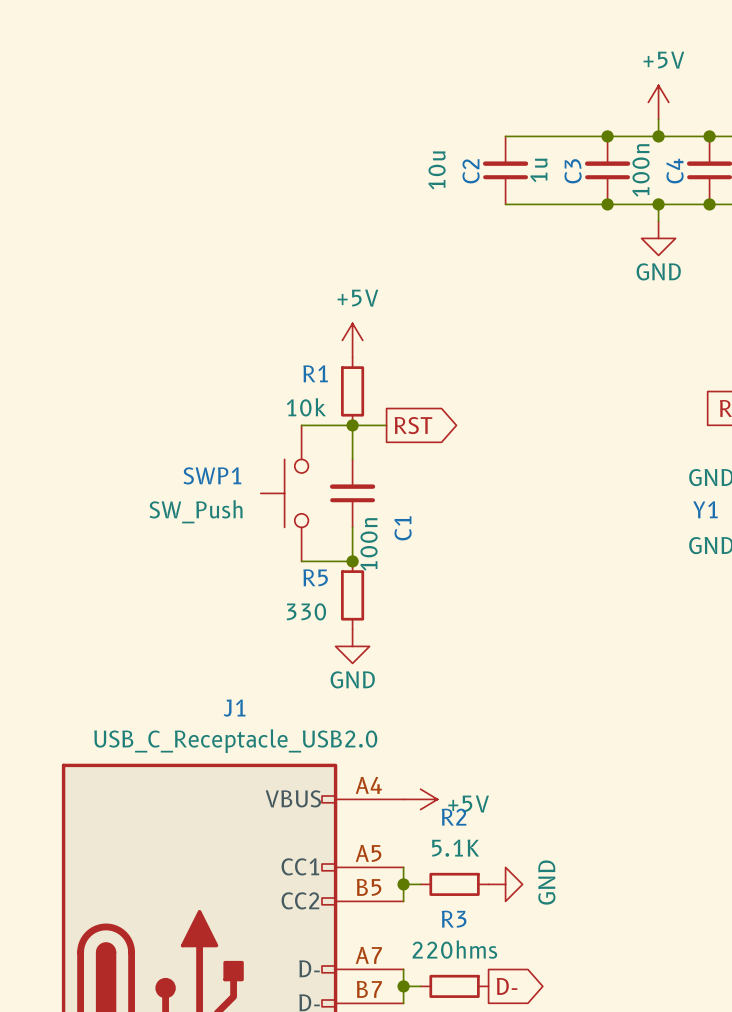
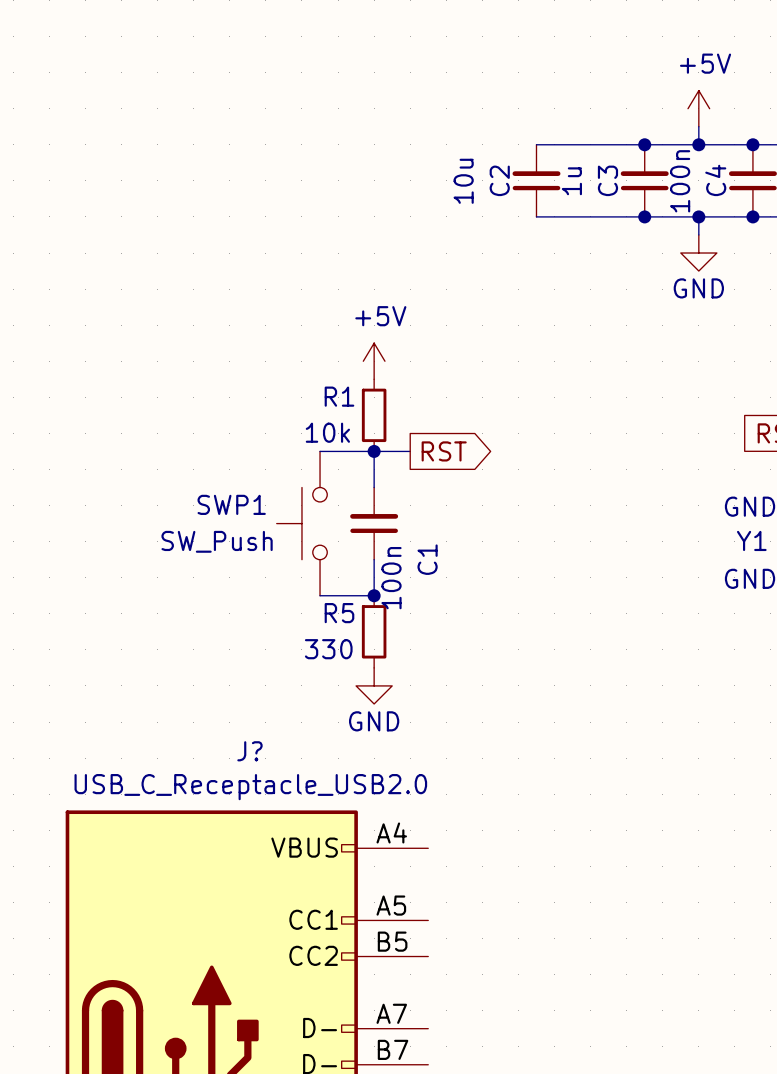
J1 name: J1 (234, 708) -> J? (249, 751)
power symbol: +5V (420, 799) -> none
wire: (403, 867) (403, 901) -> none
wire: (403, 884) (420, 884) -> none
junction: (403, 884) -> none
R2: 5.1K (454, 884) -> none
power symbol: GND (505, 884) -> none
wire: (403, 969) (403, 1003) -> none
wire: (403, 986) (420, 986) -> none
junction: (403, 986) -> none
R3: 220hms (454, 986) -> none
global label: D- (507, 986) -> none

